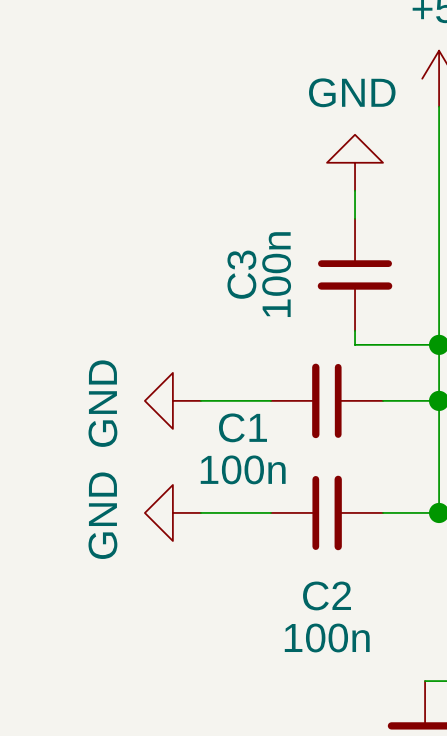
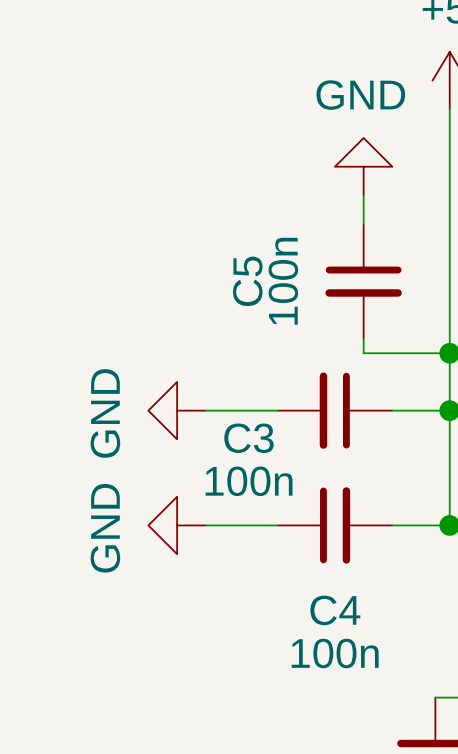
C3 name: C3 (241, 274) -> C5 (247, 281)
C1 name: C1 (242, 427) -> C3 (248, 438)
C2 name: C2 (327, 595) -> C4 (335, 610)

